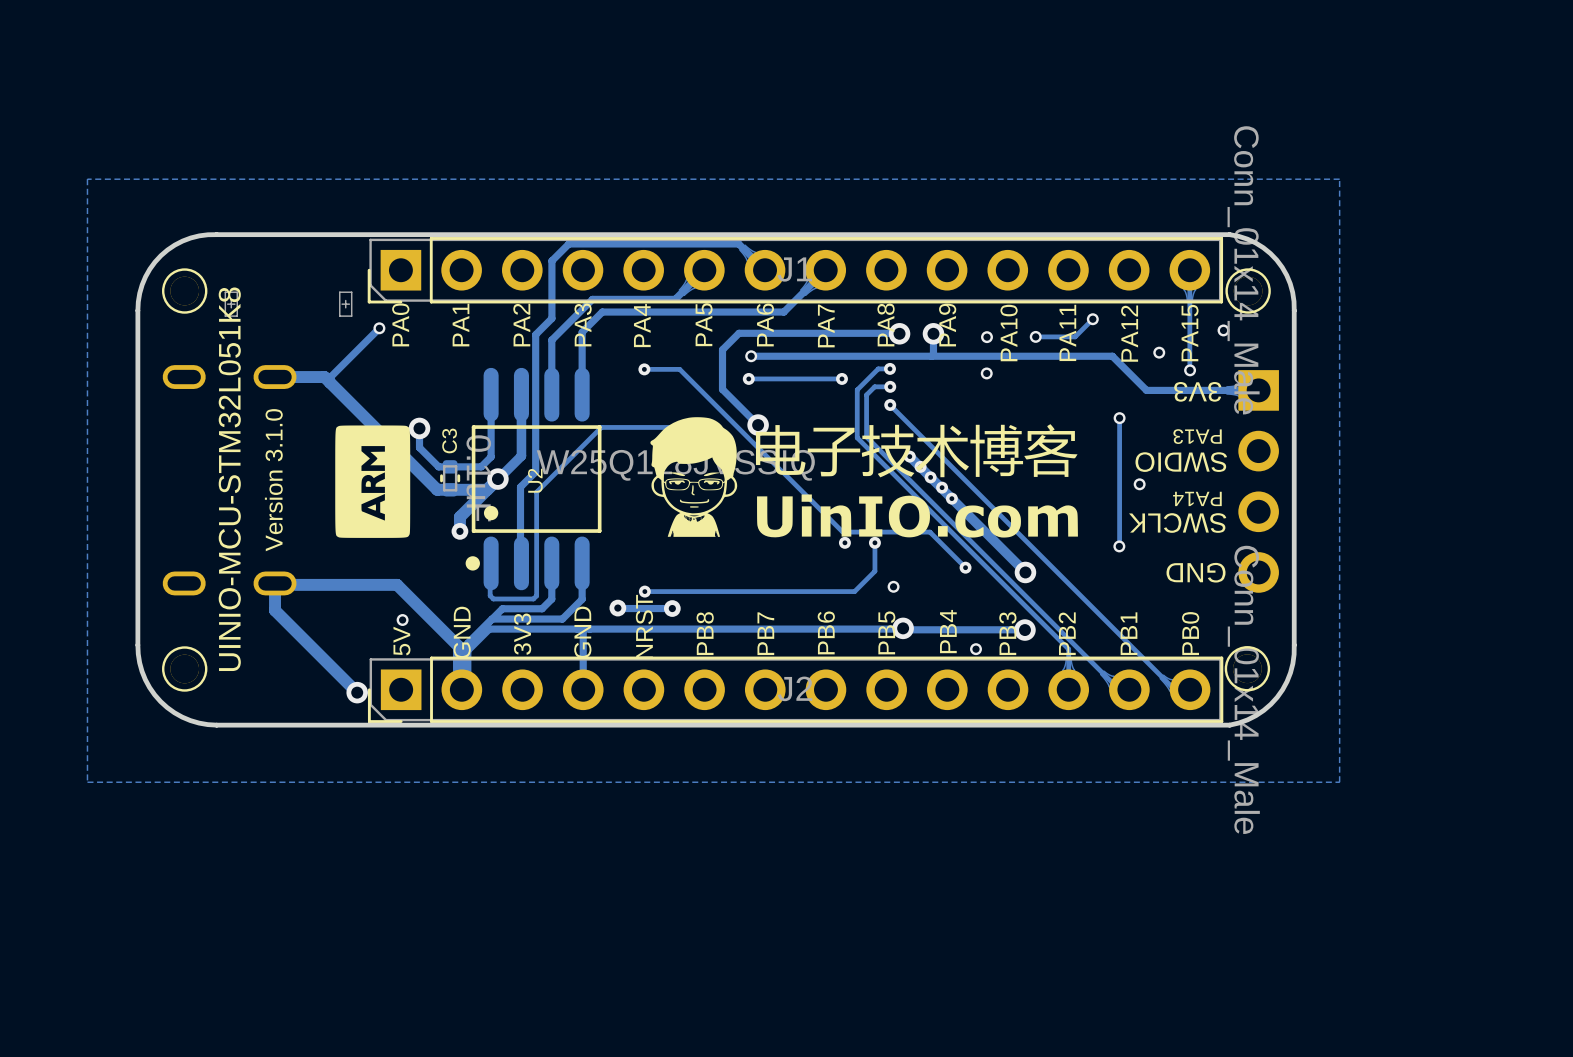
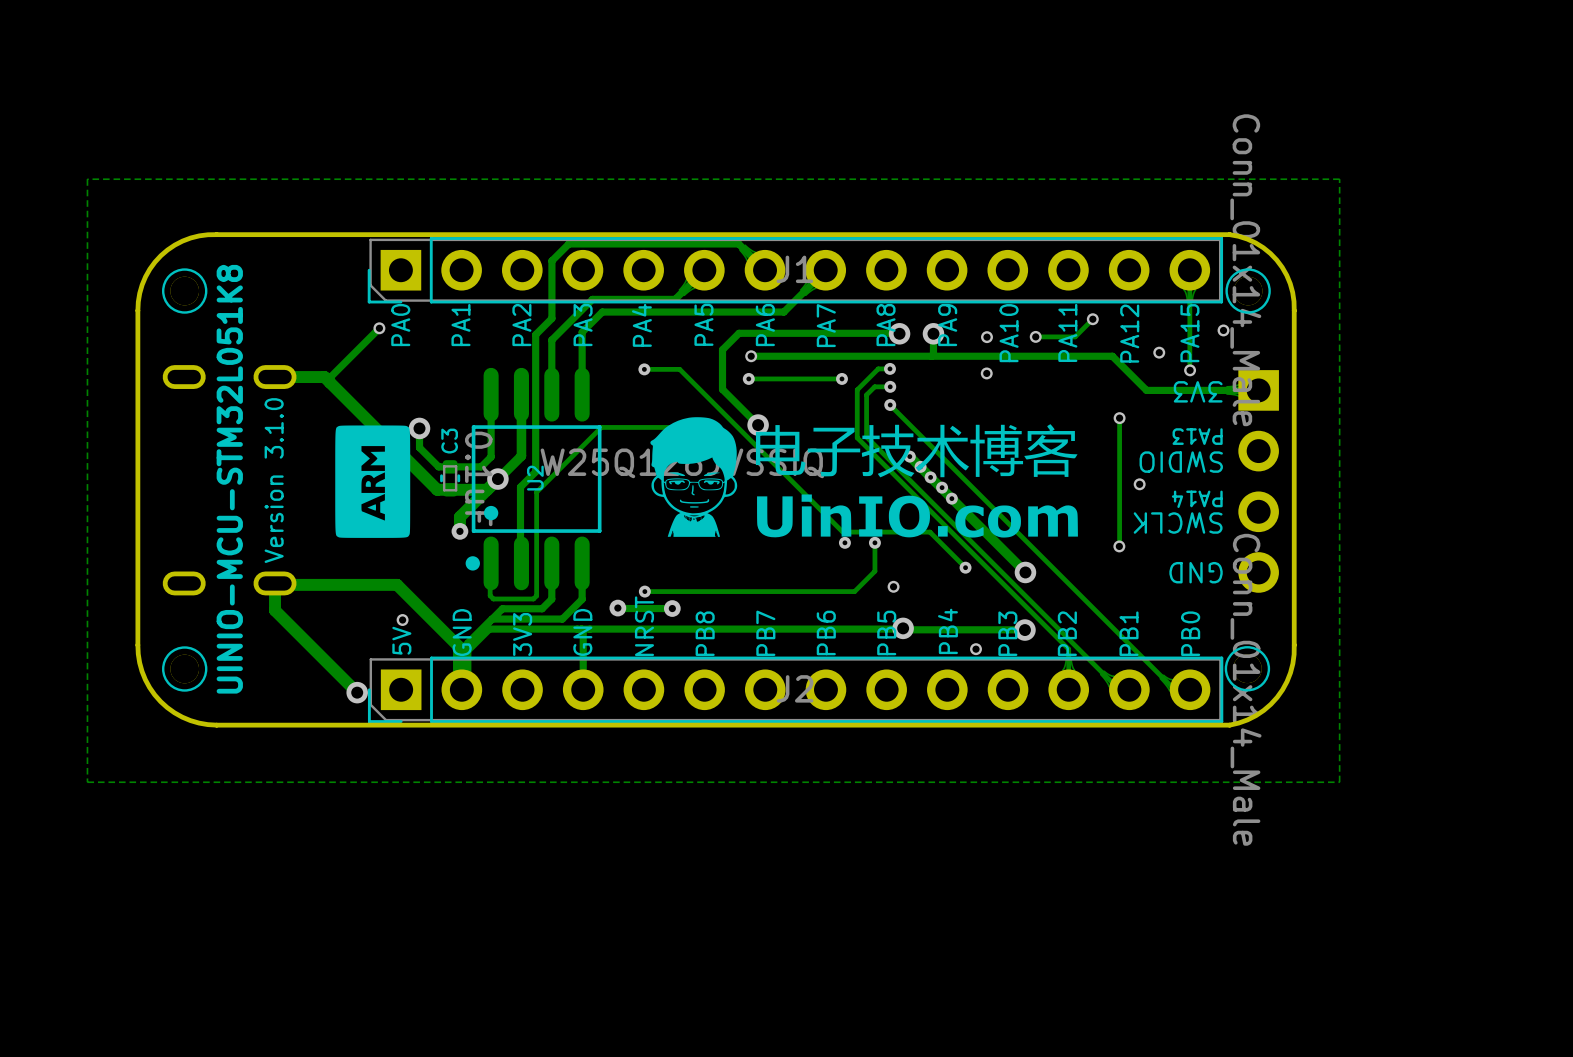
part: (231, 304) -> none
part: (345, 304) -> none

